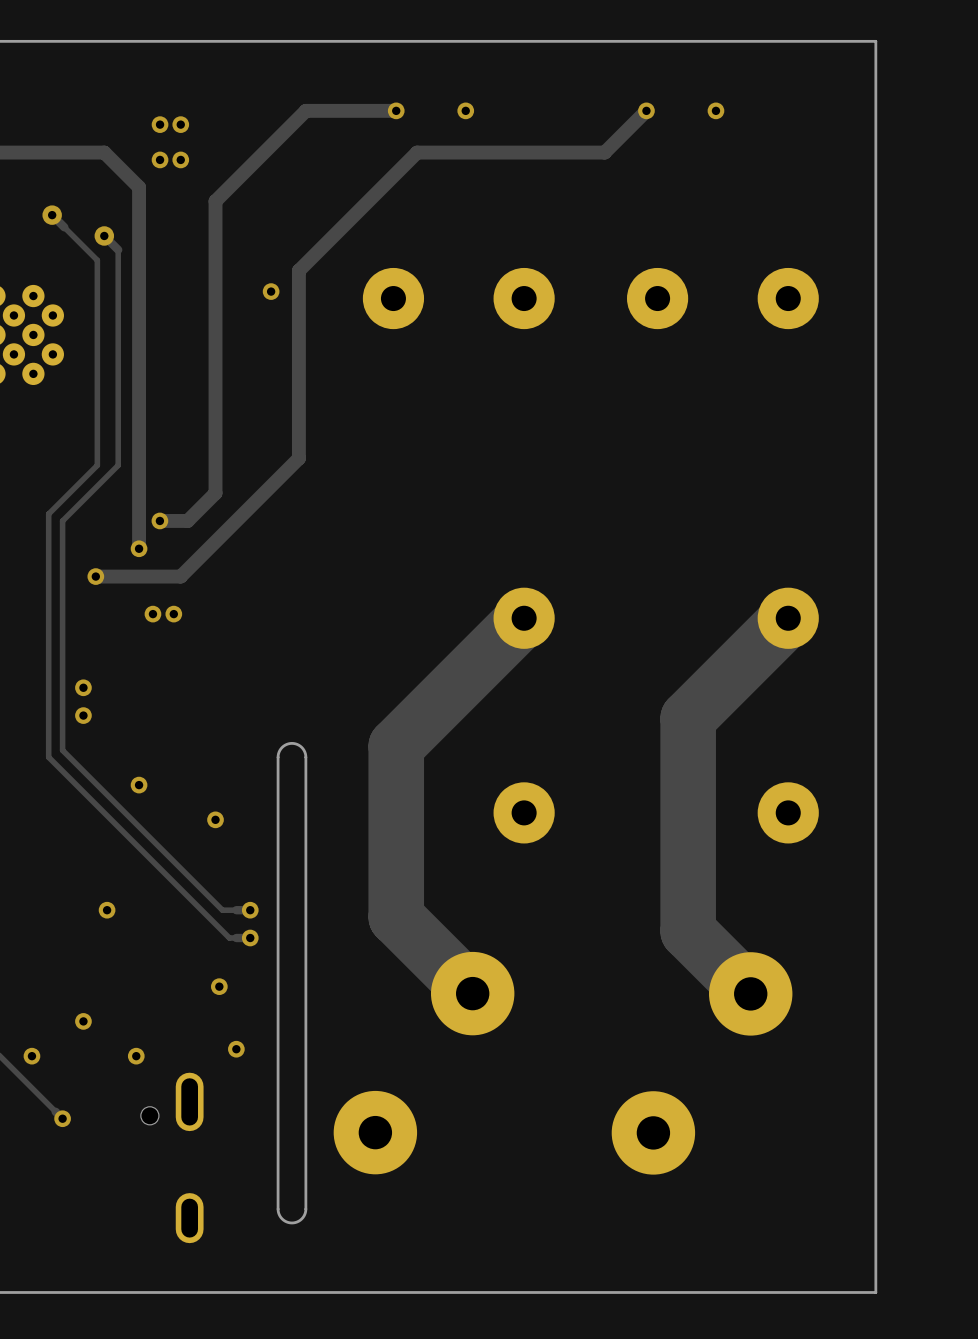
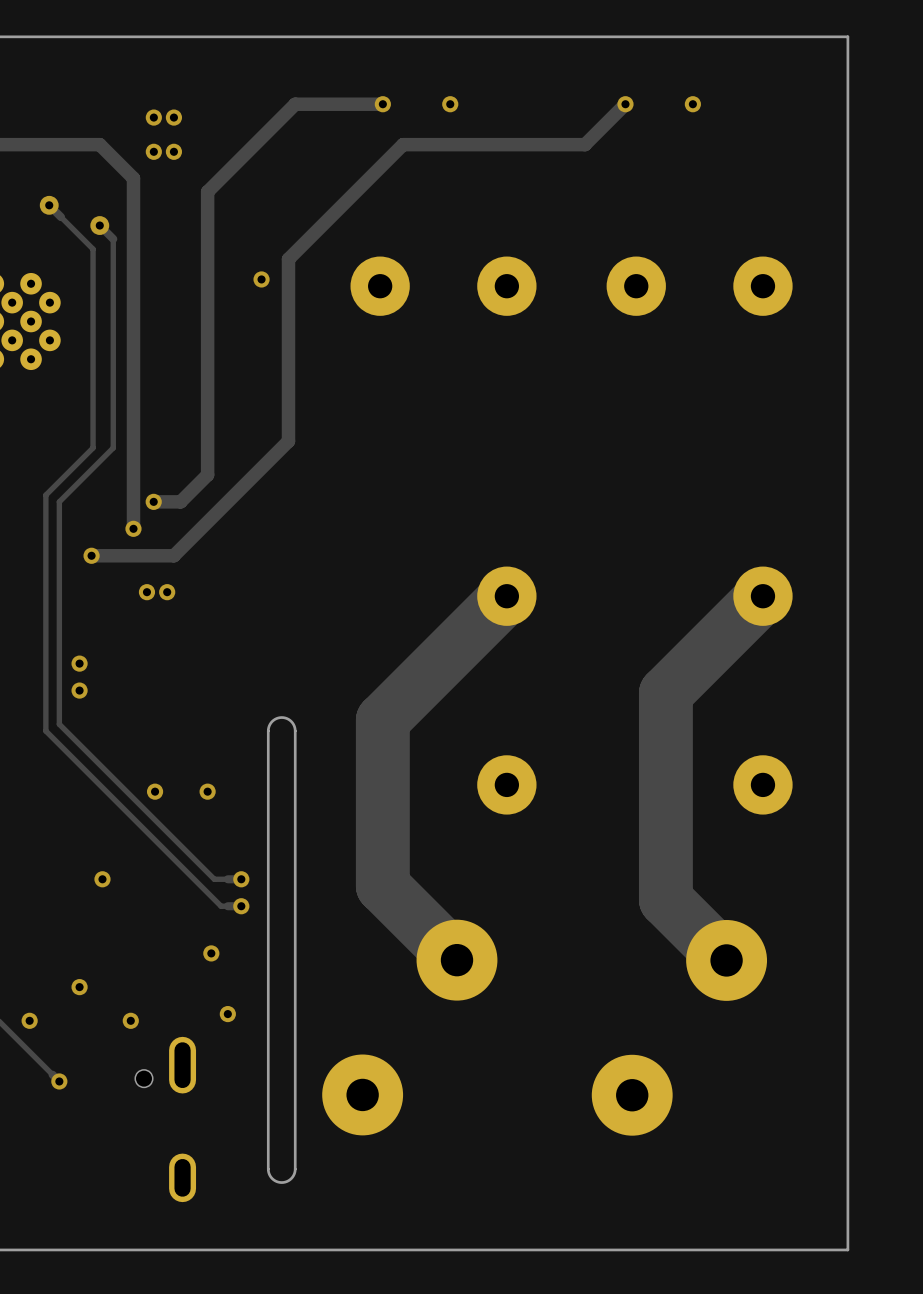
via position: (139, 785) -> (155, 791)

